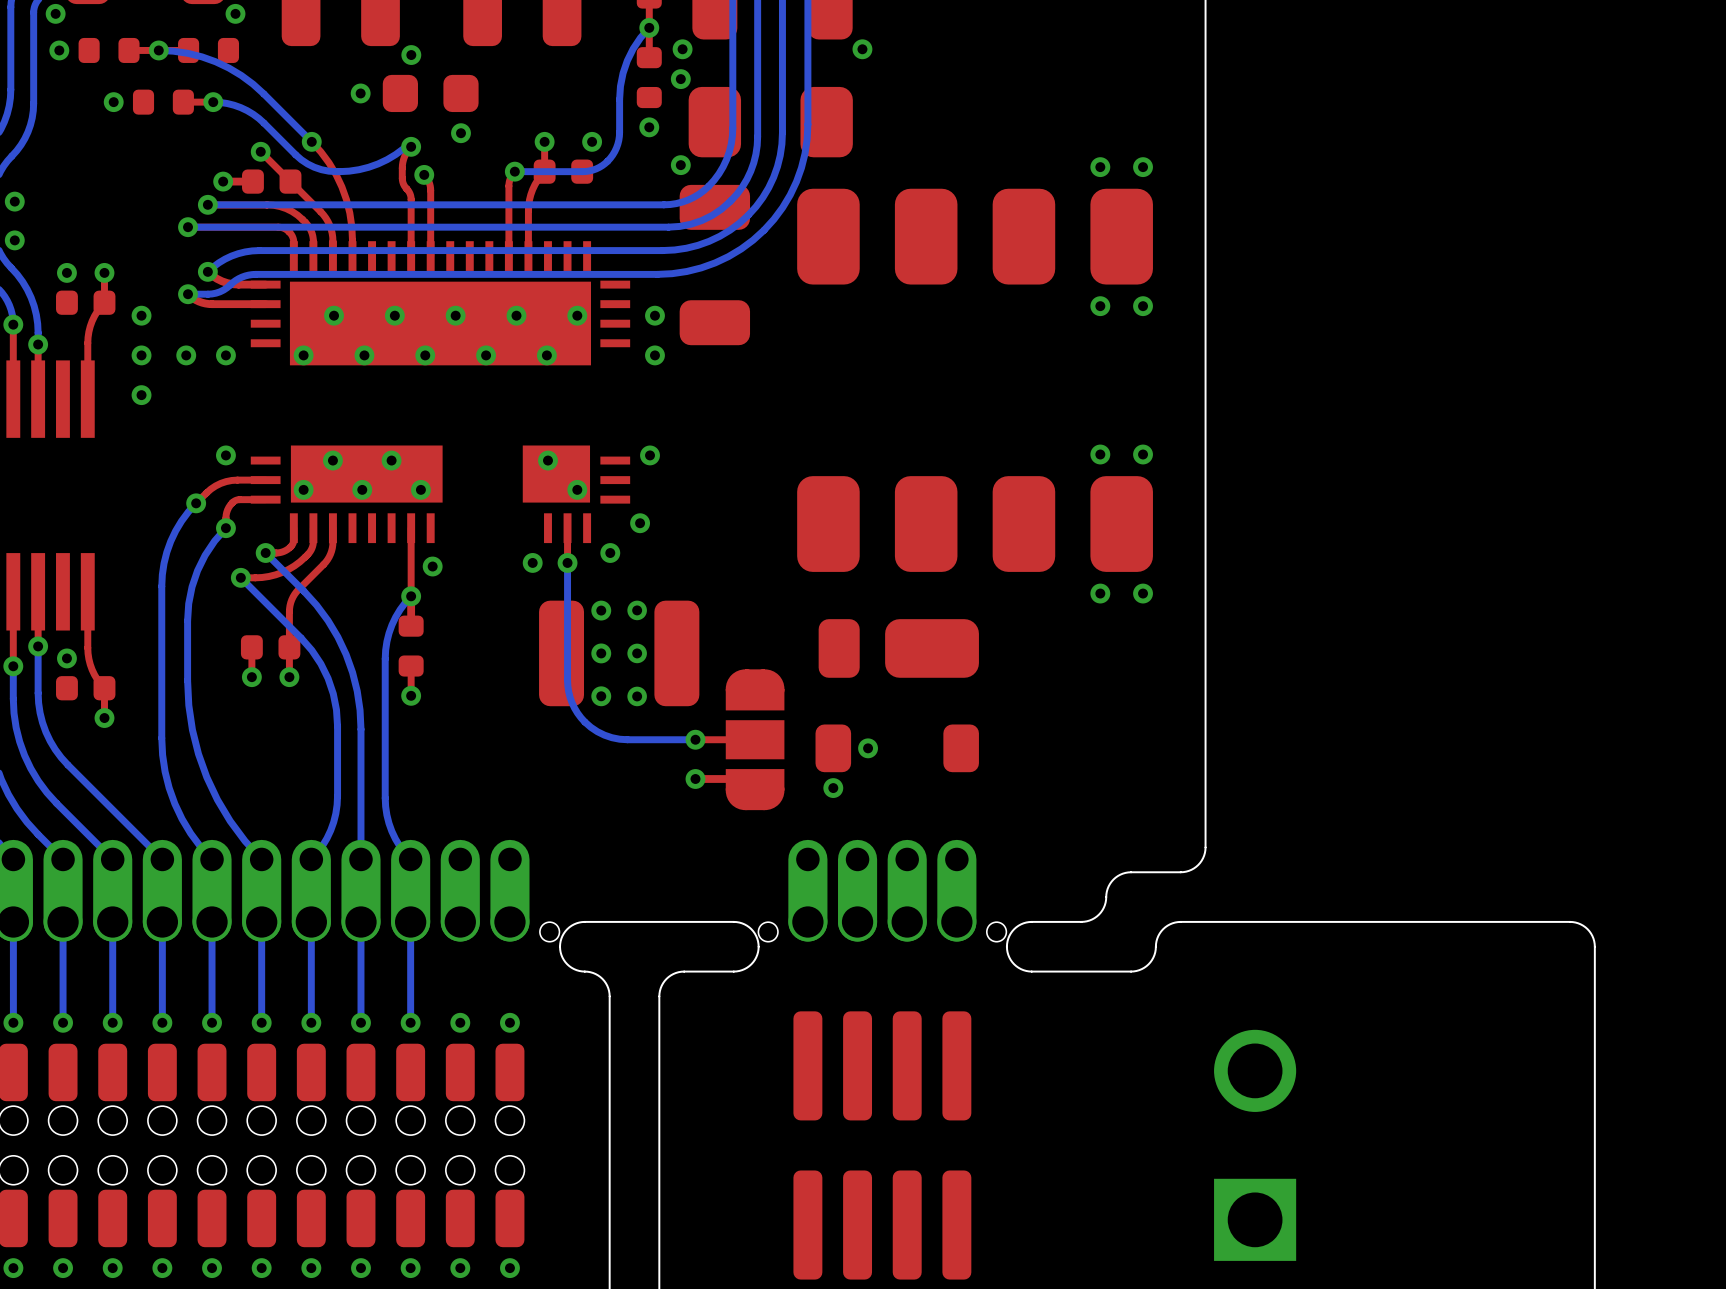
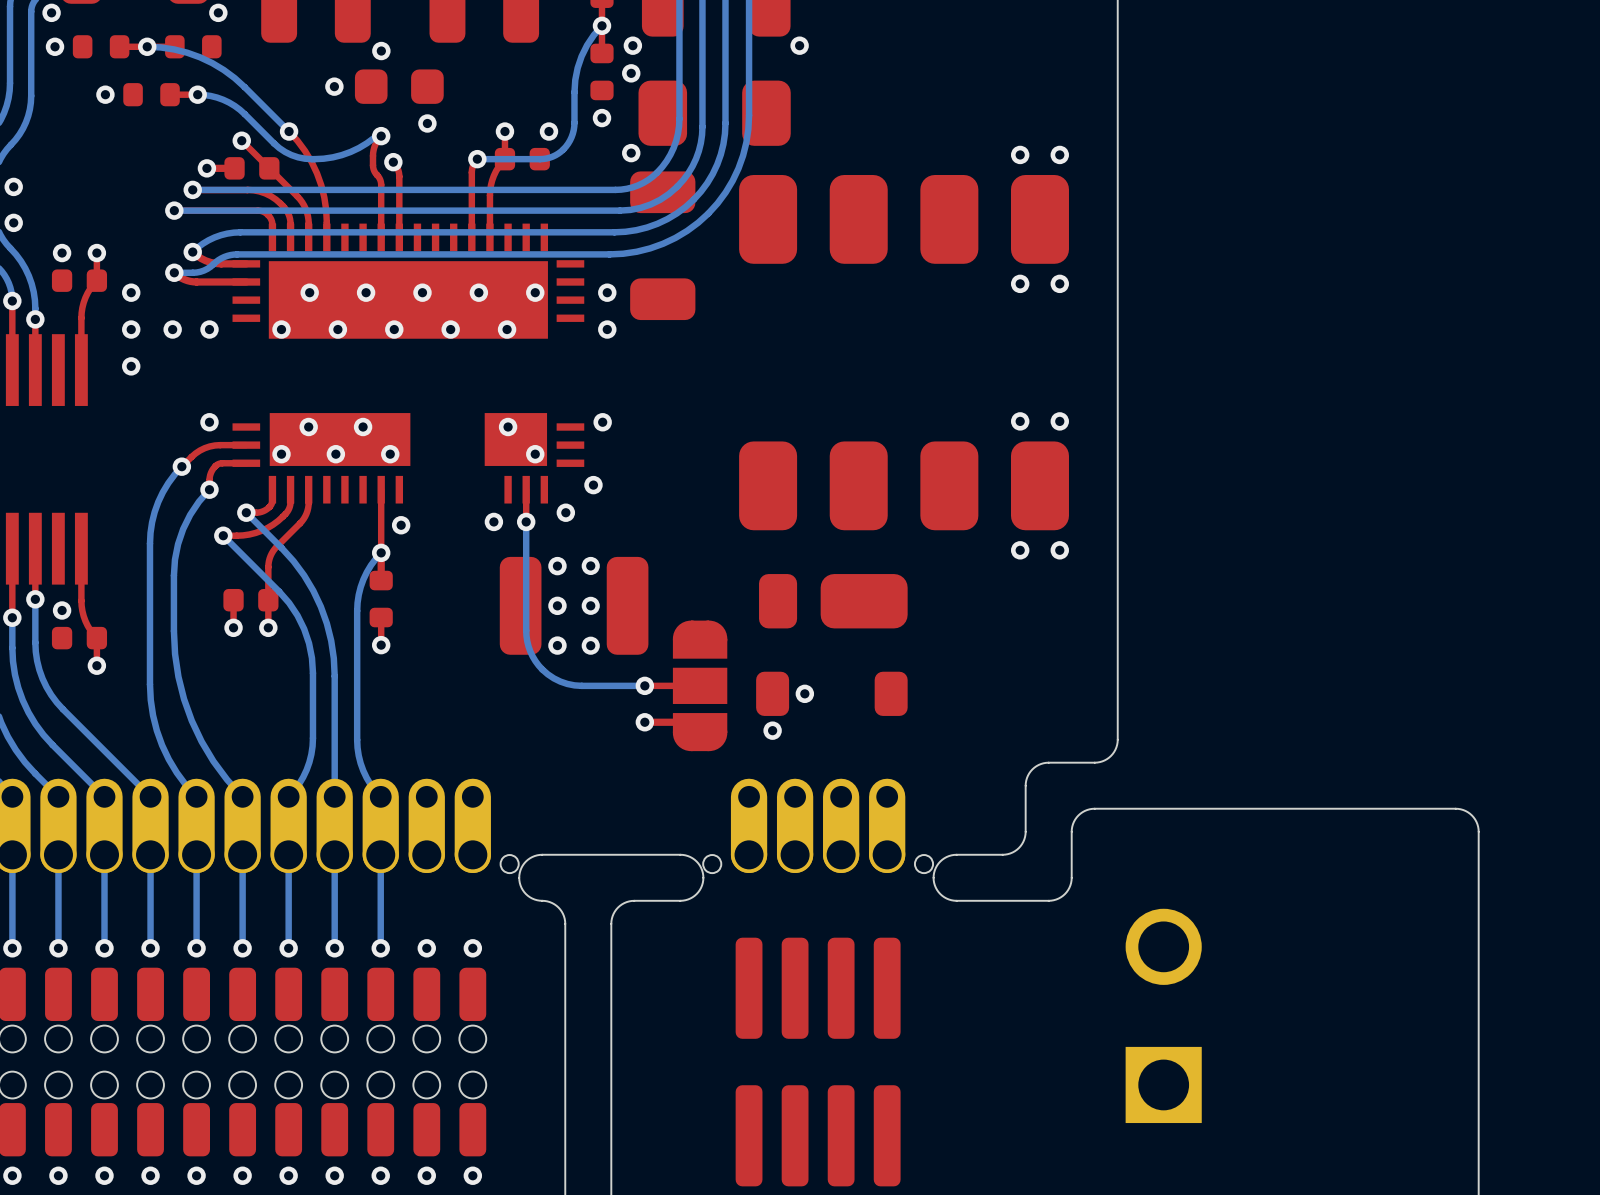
board edge: (1205, 797) (1205, 850) (1198, 864) (1183, 872) (1122, 873) (1111, 881) (1106, 897) -> (1117, 739) (1114, 751) (1102, 761) (1046, 762) (1032, 769) (1025, 783) (1025, 831)
board edge: (1594, 946) (1593, 938) (1587, 929) (1580, 924) (1570, 921) (1177, 922) (1167, 925) (1161, 931) (1155, 946) -> (1478, 877) (1477, 824) (1470, 813) (1455, 808) (1089, 809) (1078, 815) (1072, 826) (1071, 877)
part position: (1255, 1145) -> (1163, 1015)

